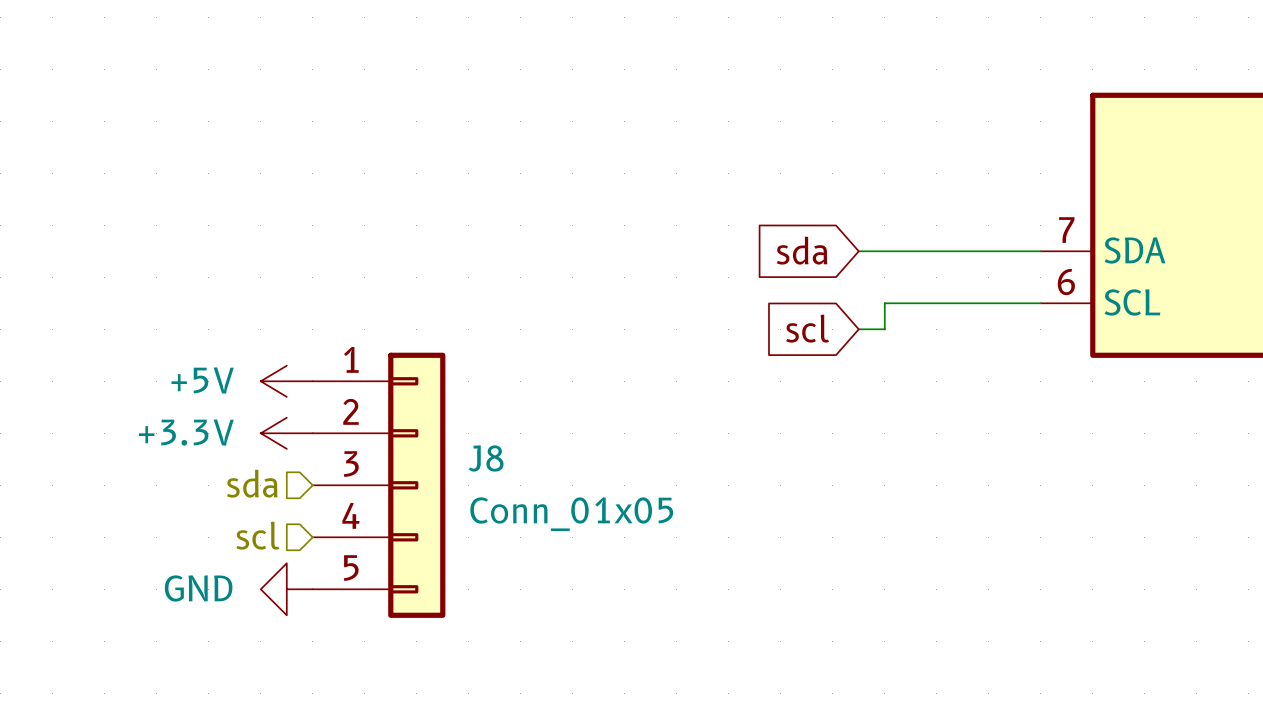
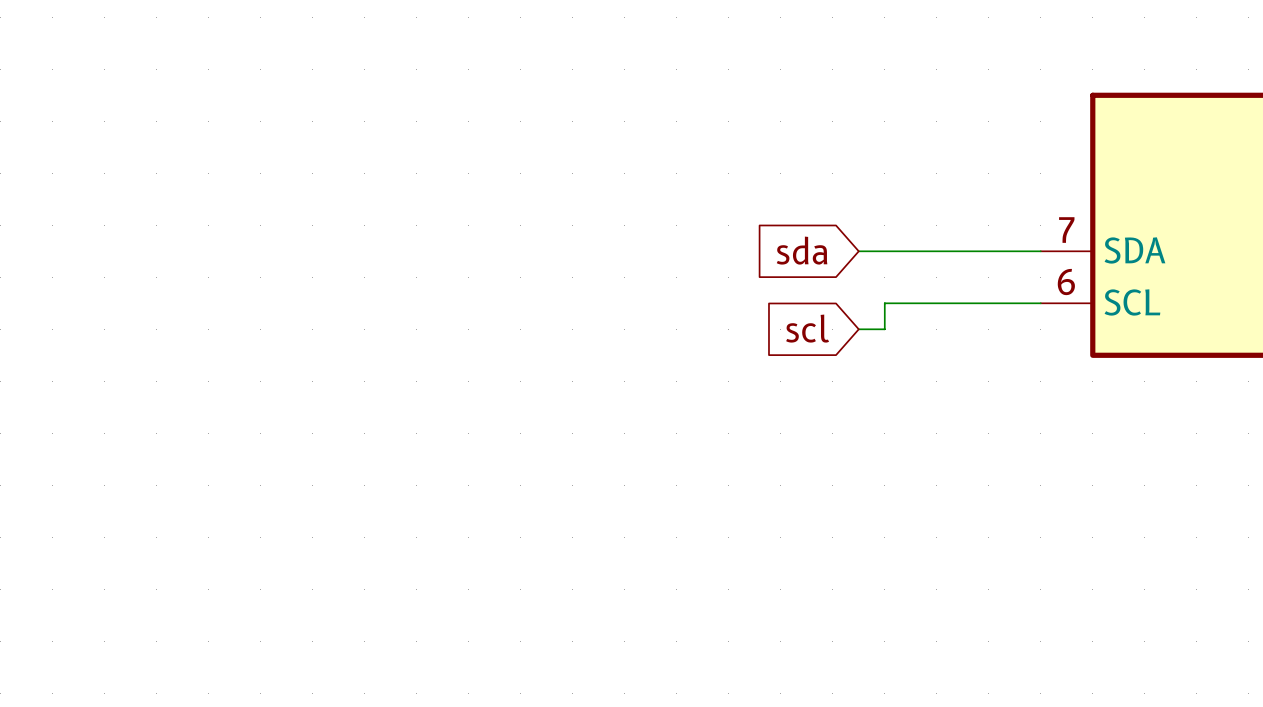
power symbol: +5V (286, 381) -> none
power symbol: +3.3V (286, 433) -> none
hierarchical label: sda (252, 483) -> none
J8: Conn_01x05 (379, 485) -> none
hierarchical label: scl (257, 535) -> none
power symbol: GND (286, 589) -> none

